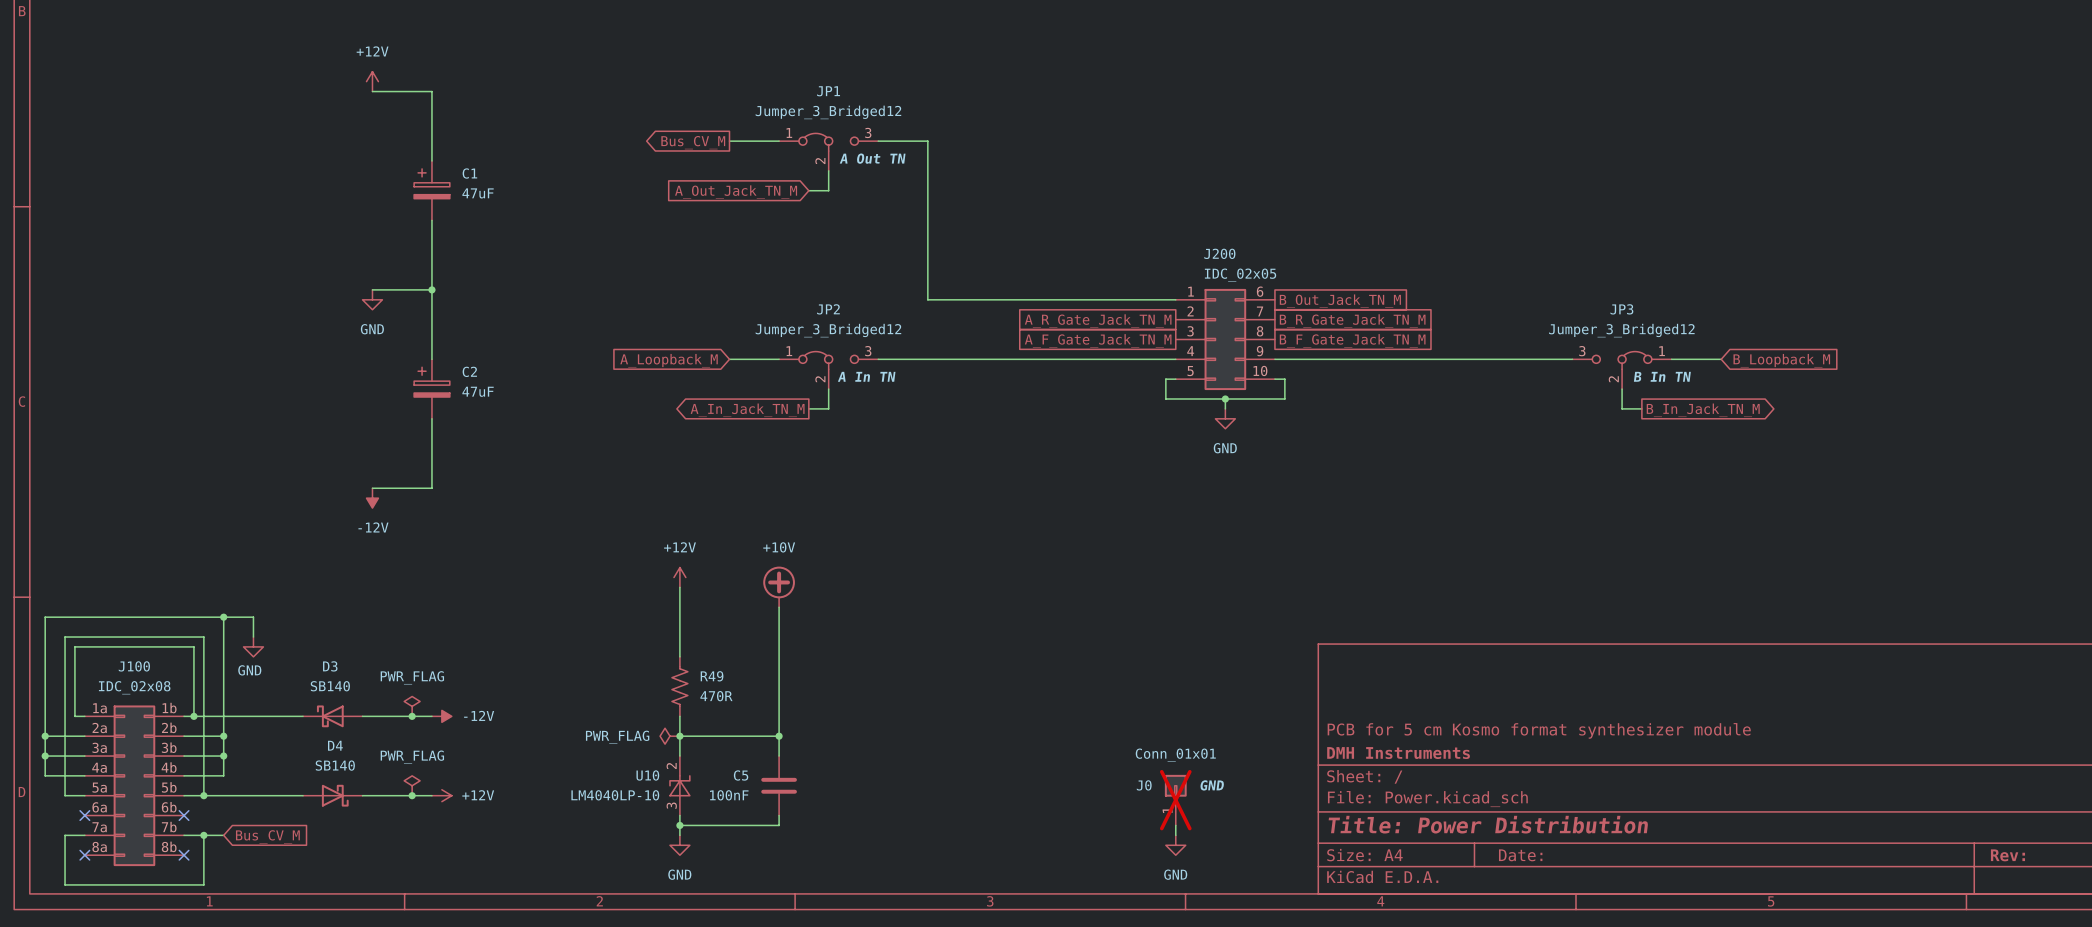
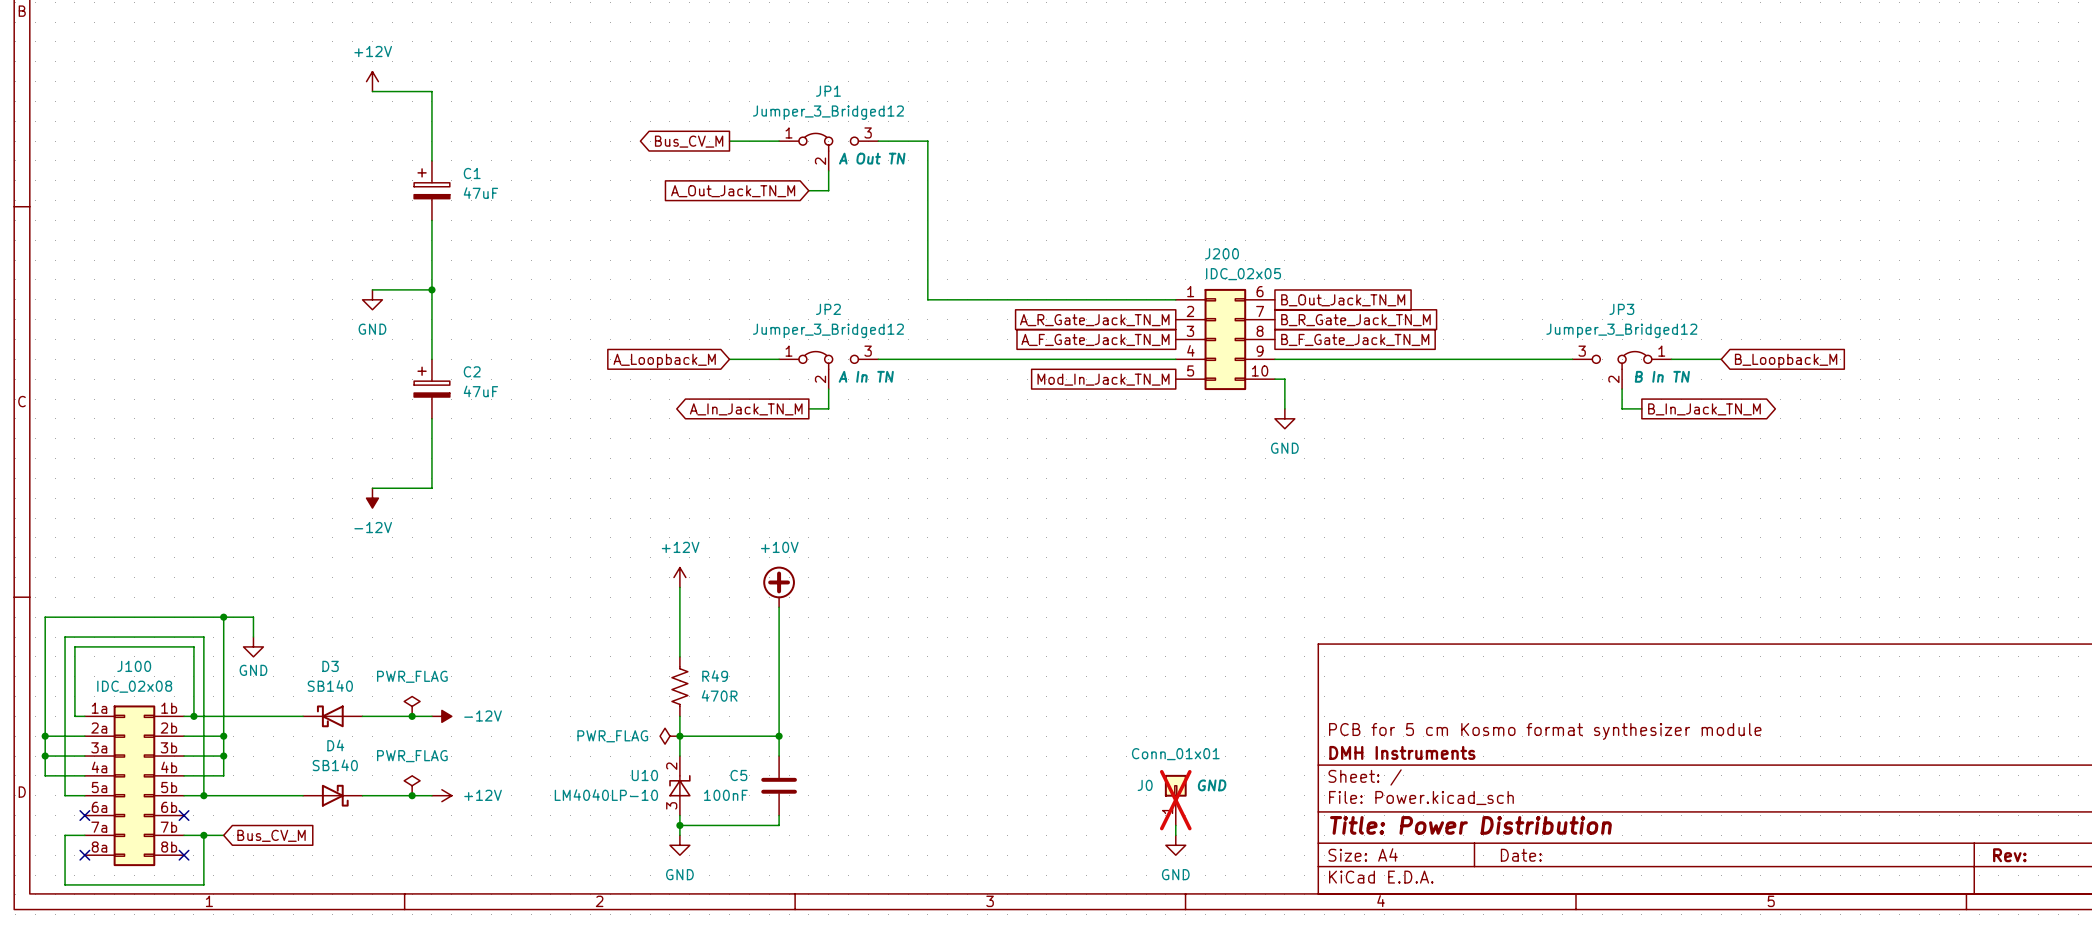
wire: (1175, 379) (1165, 379) (1165, 399) (1284, 399) -> (1284, 408) (1284, 399)
global label: none -> Mod_In_Jack_TN_M (1103, 379)
wire: (1225, 399) (1225, 408) -> none
junction: (1225, 399) -> none
power symbol position: GND (1225, 418) -> GND (1284, 418)

